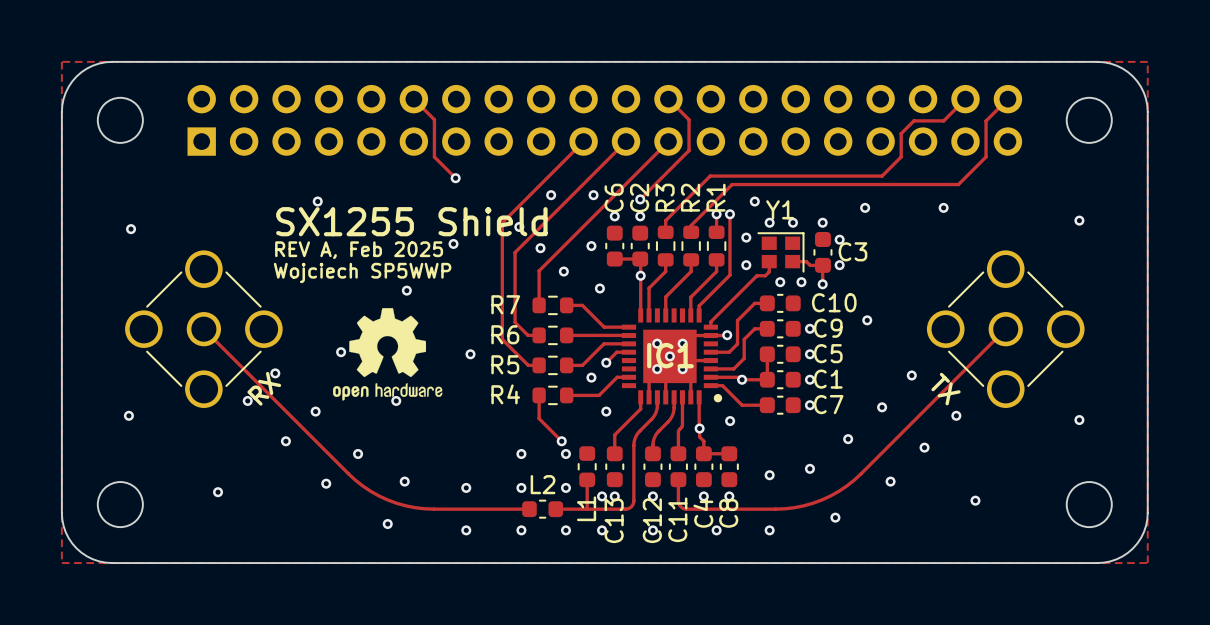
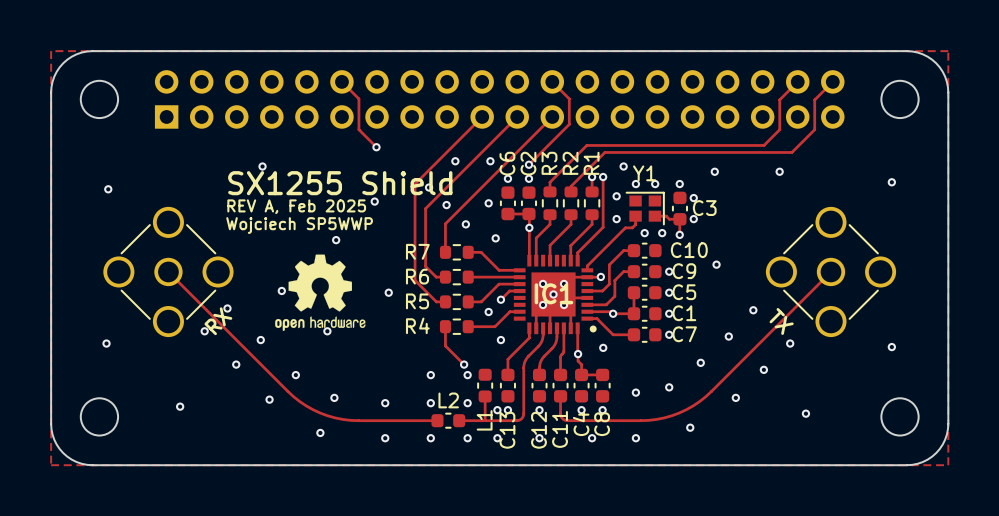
track: (943, 120) (913, 120) (901, 133) (901, 156) (882, 176) -> (779, 99) (779, 129) (763, 145) (728, 145)

